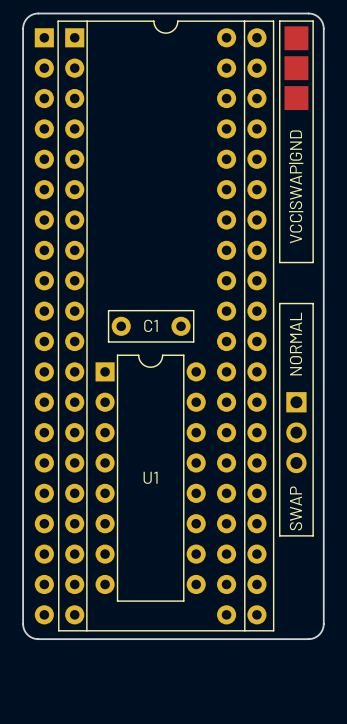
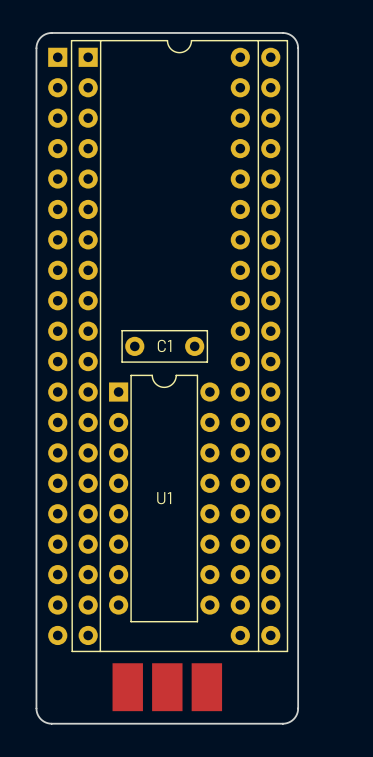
board edge: (269, 13) (312, 14) (319, 17) (323, 26) (322, 629) (316, 637) (308, 639) (38, 639) (27, 634) (23, 623) -> (282, 32) (293, 37) (298, 48) (296, 714) (290, 721) (282, 723) (47, 723) (39, 717) (36, 710) (36, 644)
line: (279, 21) (279, 262) (313, 262) (313, 21) (279, 21) -> none
part: (296, 68) -> none
text: VCC|SWAP|GND (296, 186) -> none
line: (279, 303) (279, 535) (313, 535) (313, 303) (279, 303) -> none
text: NORMAL (295, 344) -> none
part: (296, 432) -> none
text: SWAP (295, 508) -> none
part: none -> (167, 687)

